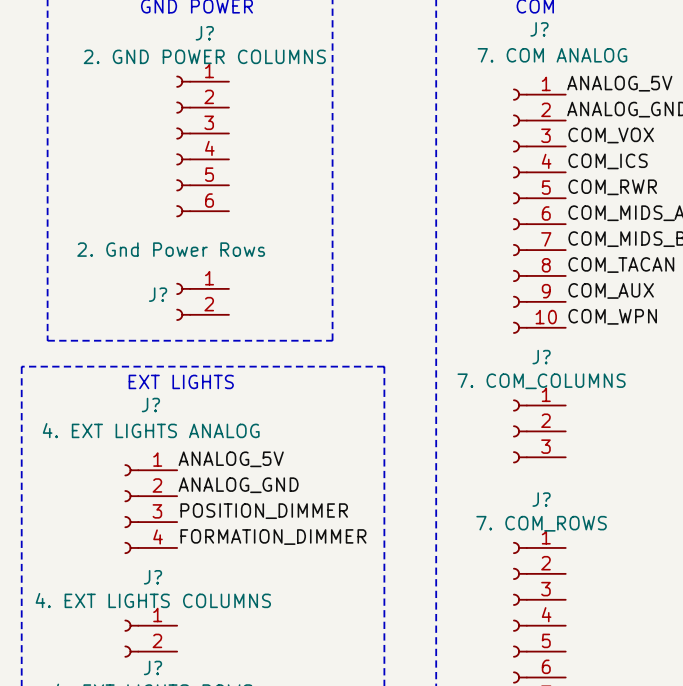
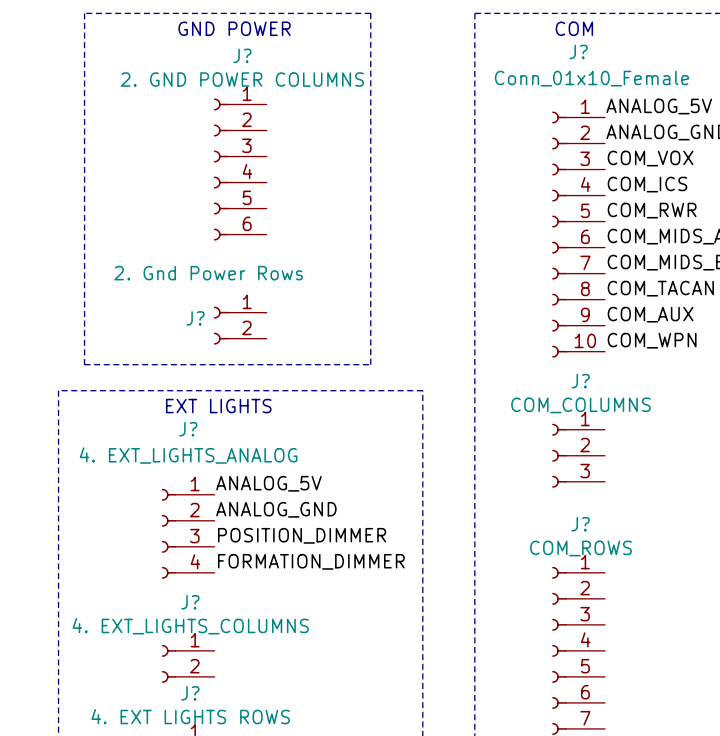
J? value: 7. COM ANALOG (552, 55) -> Conn_01x10_Female (591, 78)
J? value: 7. COM_COLUMNS (541, 381) -> COM_COLUMNS (580, 405)
J? value: 4. EXT LIGHTS ANALOG (151, 430) -> 4. EXT_LIGHTS_ANALOG (188, 455)
J? value: 7. COM_ROWS (541, 523) -> COM_ROWS (580, 548)
J? value: 4. EXT LIGHTS COLUMNS (153, 600) -> 4. EXT_LIGHTS_COLUMNS (190, 626)

